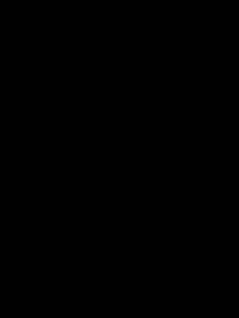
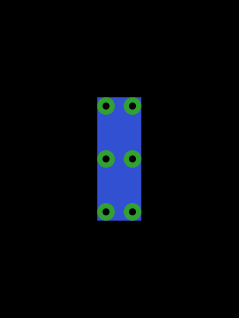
part: none -> (119, 158)

